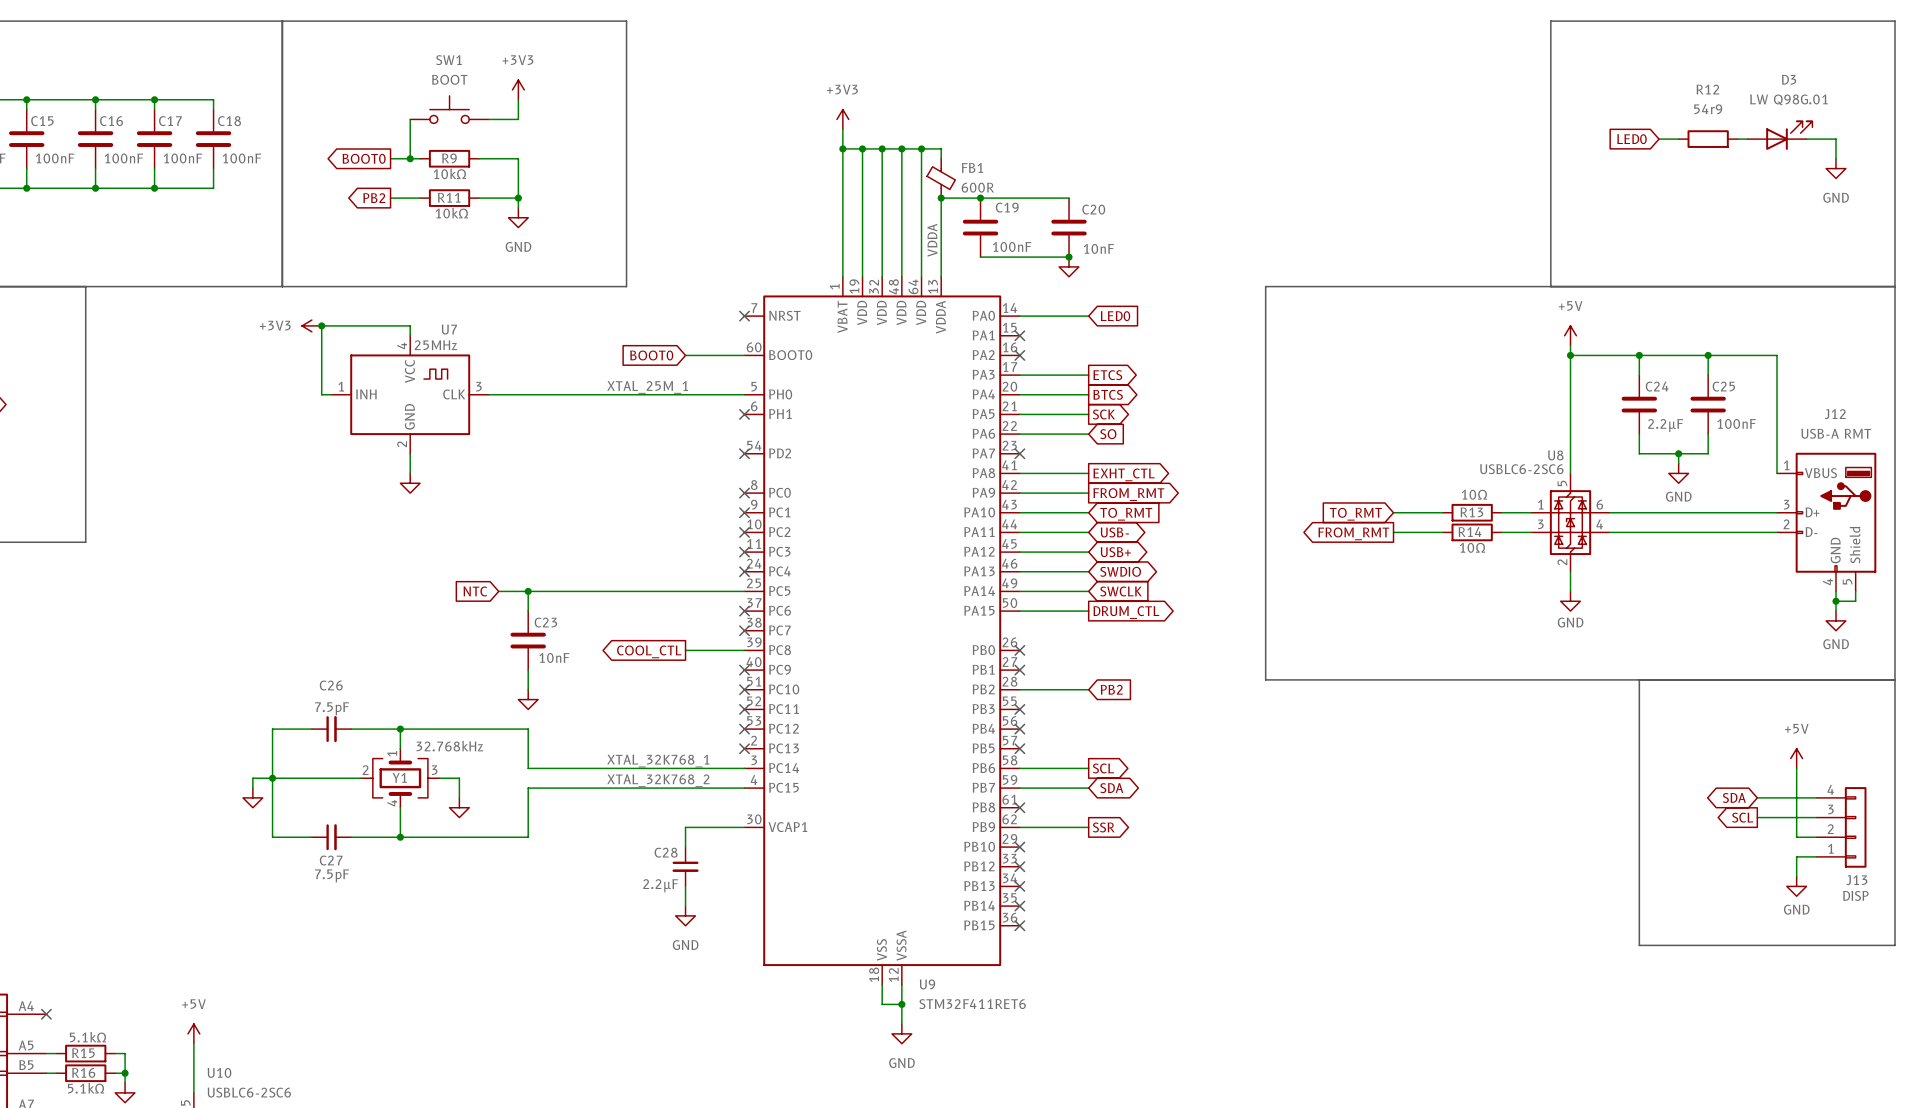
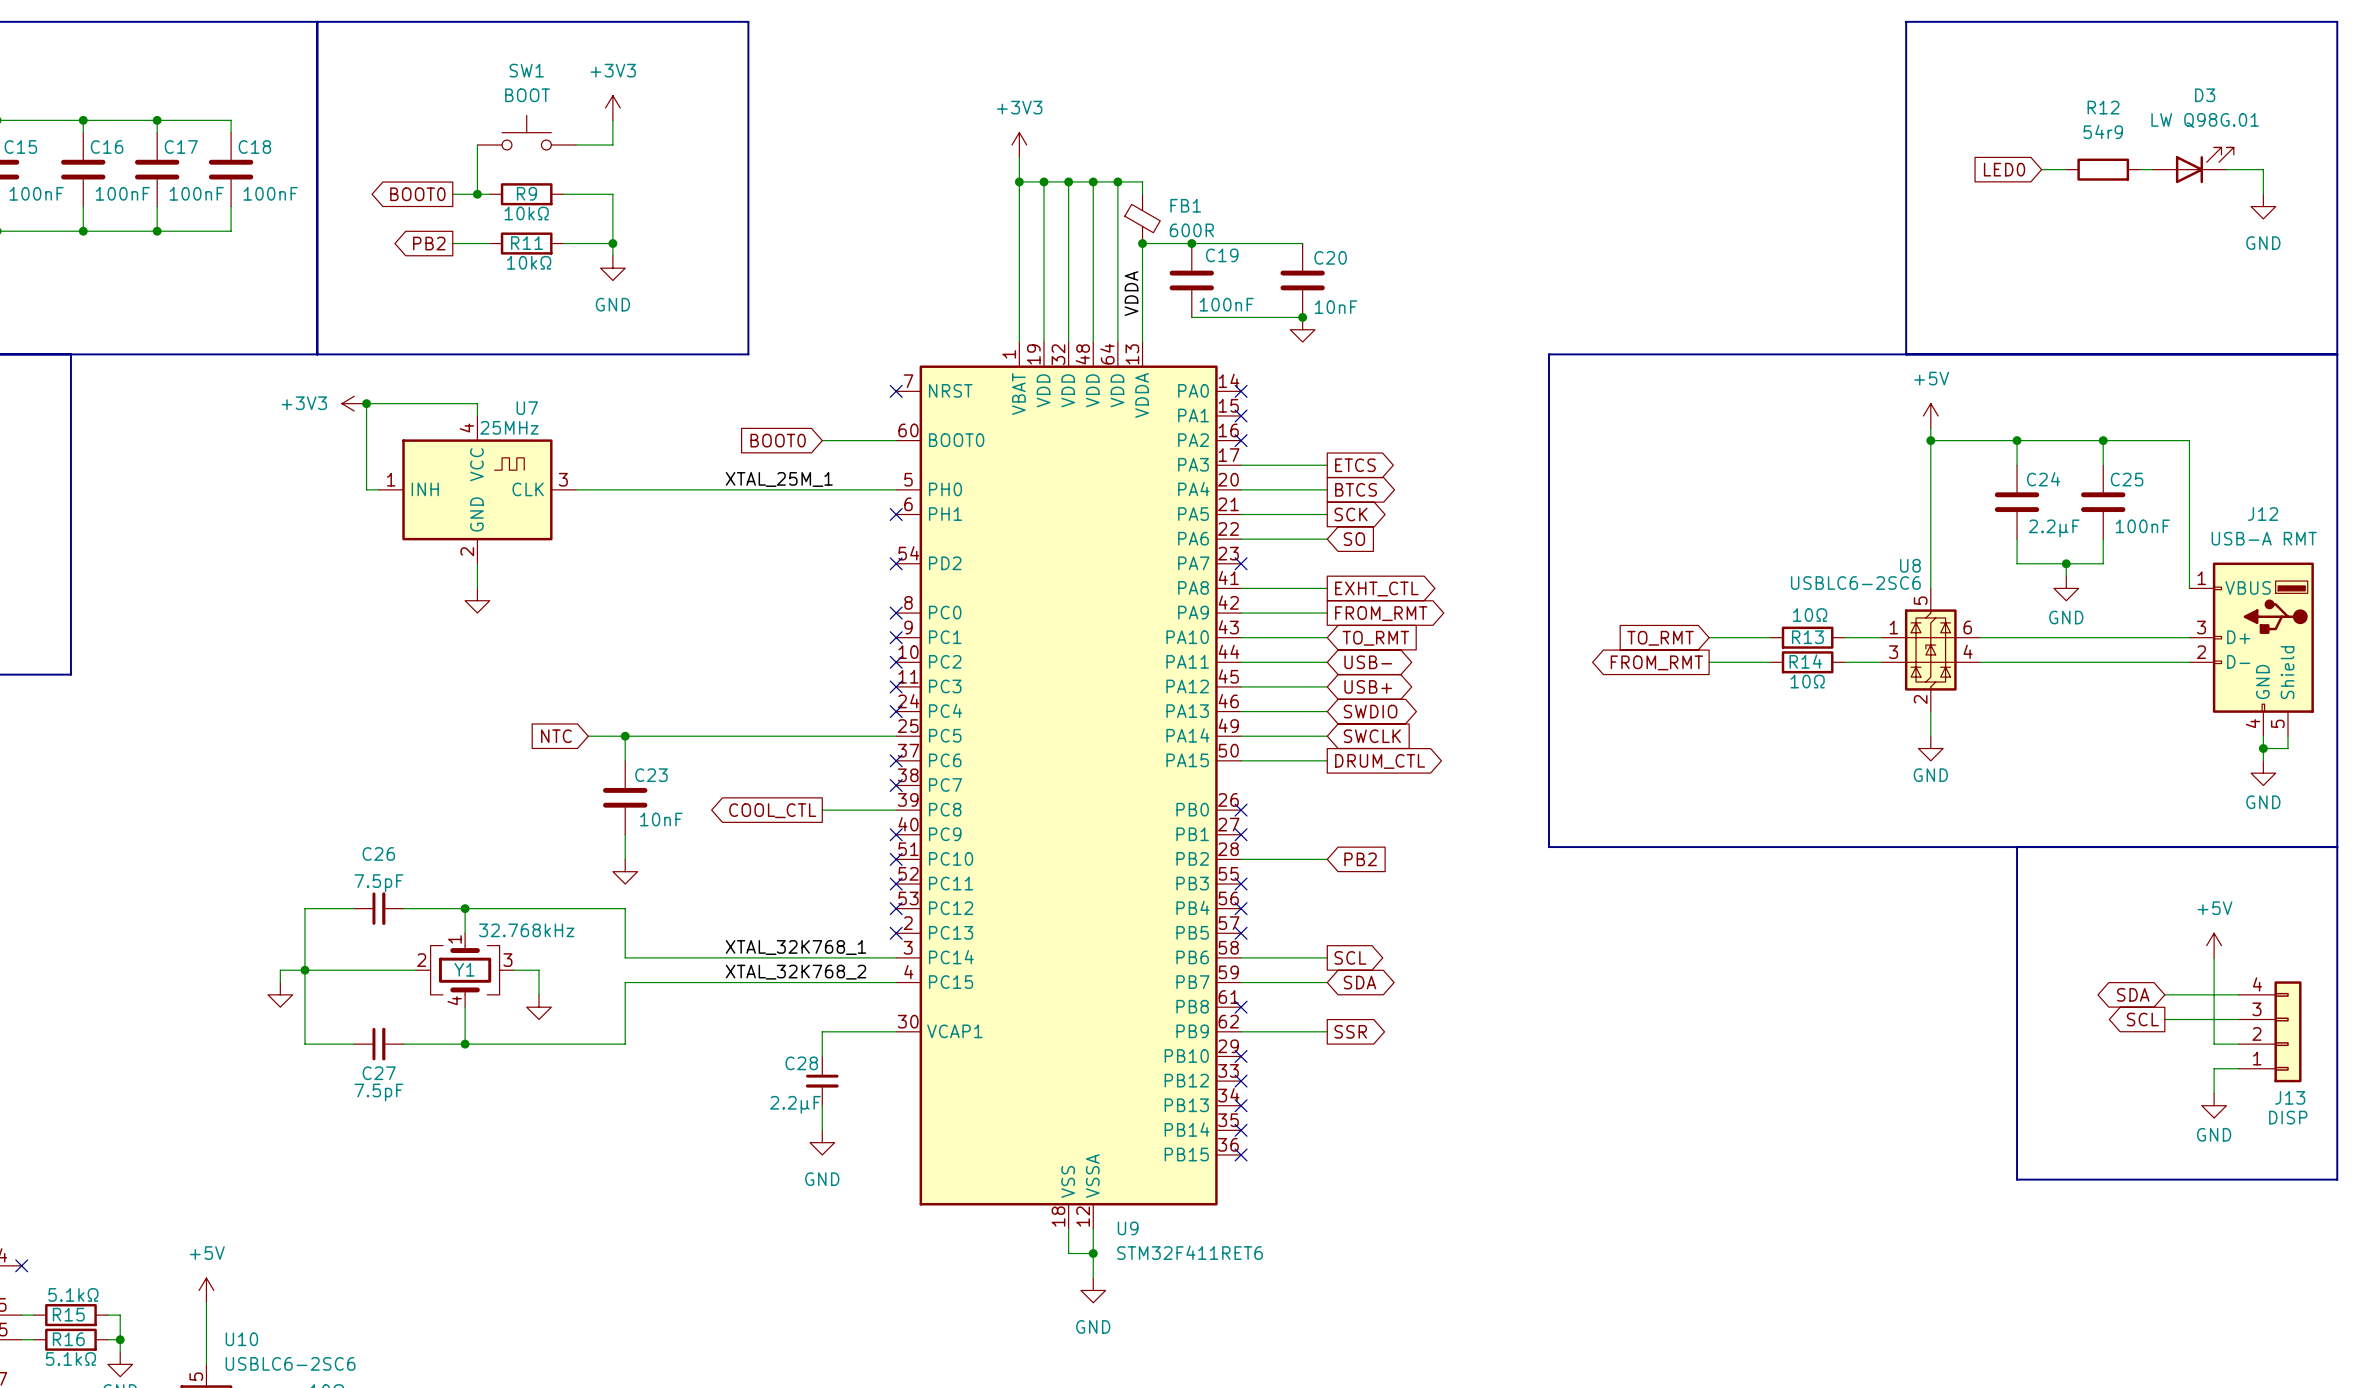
wire: (1019, 316) (1088, 316) -> none
no-connect mark: none -> (1241, 391)
global label: LED0 (1115, 316) -> none

